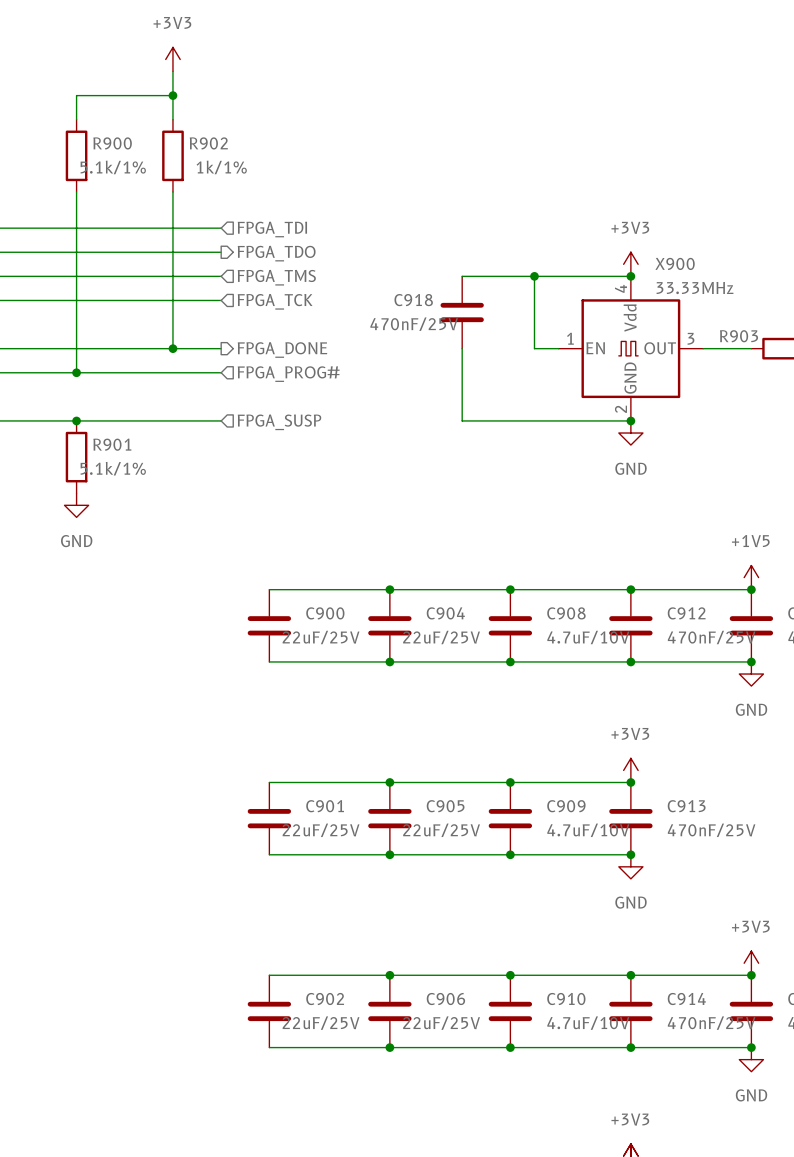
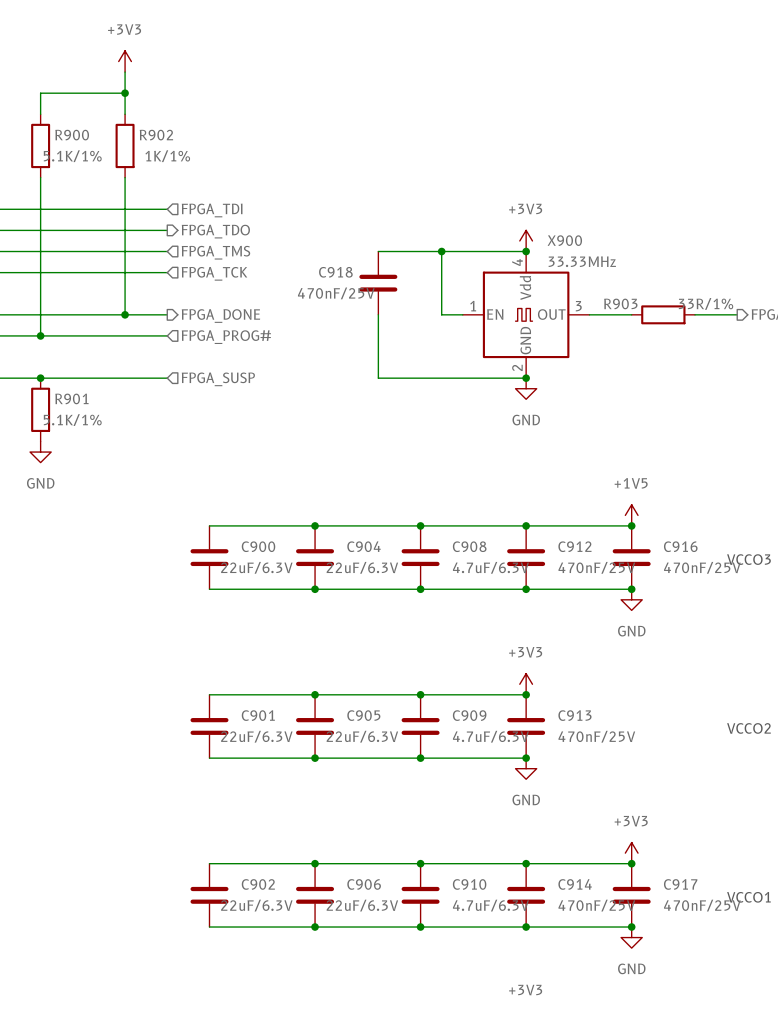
R900 value: 5.1k/1% (113, 167) -> 5.1K/1% (72, 156)
R902 value: 1k/1% (221, 167) -> 1K/1% (167, 156)
R901 value: 5.1k/1% (113, 468) -> 5.1K/1% (72, 420)
C900 value: 22uF/25V (321, 637) -> 22uF/6.3V (256, 567)
C904 value: 22uF/25V (441, 637) -> 22uF/6.3V (362, 567)
C908 value: 4.7uF/10V (588, 637) -> 4.7uF/6.3V (490, 567)
C901 value: 22uF/25V (321, 830) -> 22uF/6.3V (256, 736)
C905 value: 22uF/25V (441, 830) -> 22uF/6.3V (362, 736)
C909 value: 4.7uF/10V (588, 830) -> 4.7uF/6.3V (490, 736)
C902 value: 22uF/25V (321, 1023) -> 22uF/6.3V (256, 905)
C906 value: 22uF/25V (441, 1023) -> 22uF/6.3V (362, 905)
C910 value: 4.7uF/10V (588, 1023) -> 4.7uF/6.3V (490, 905)

